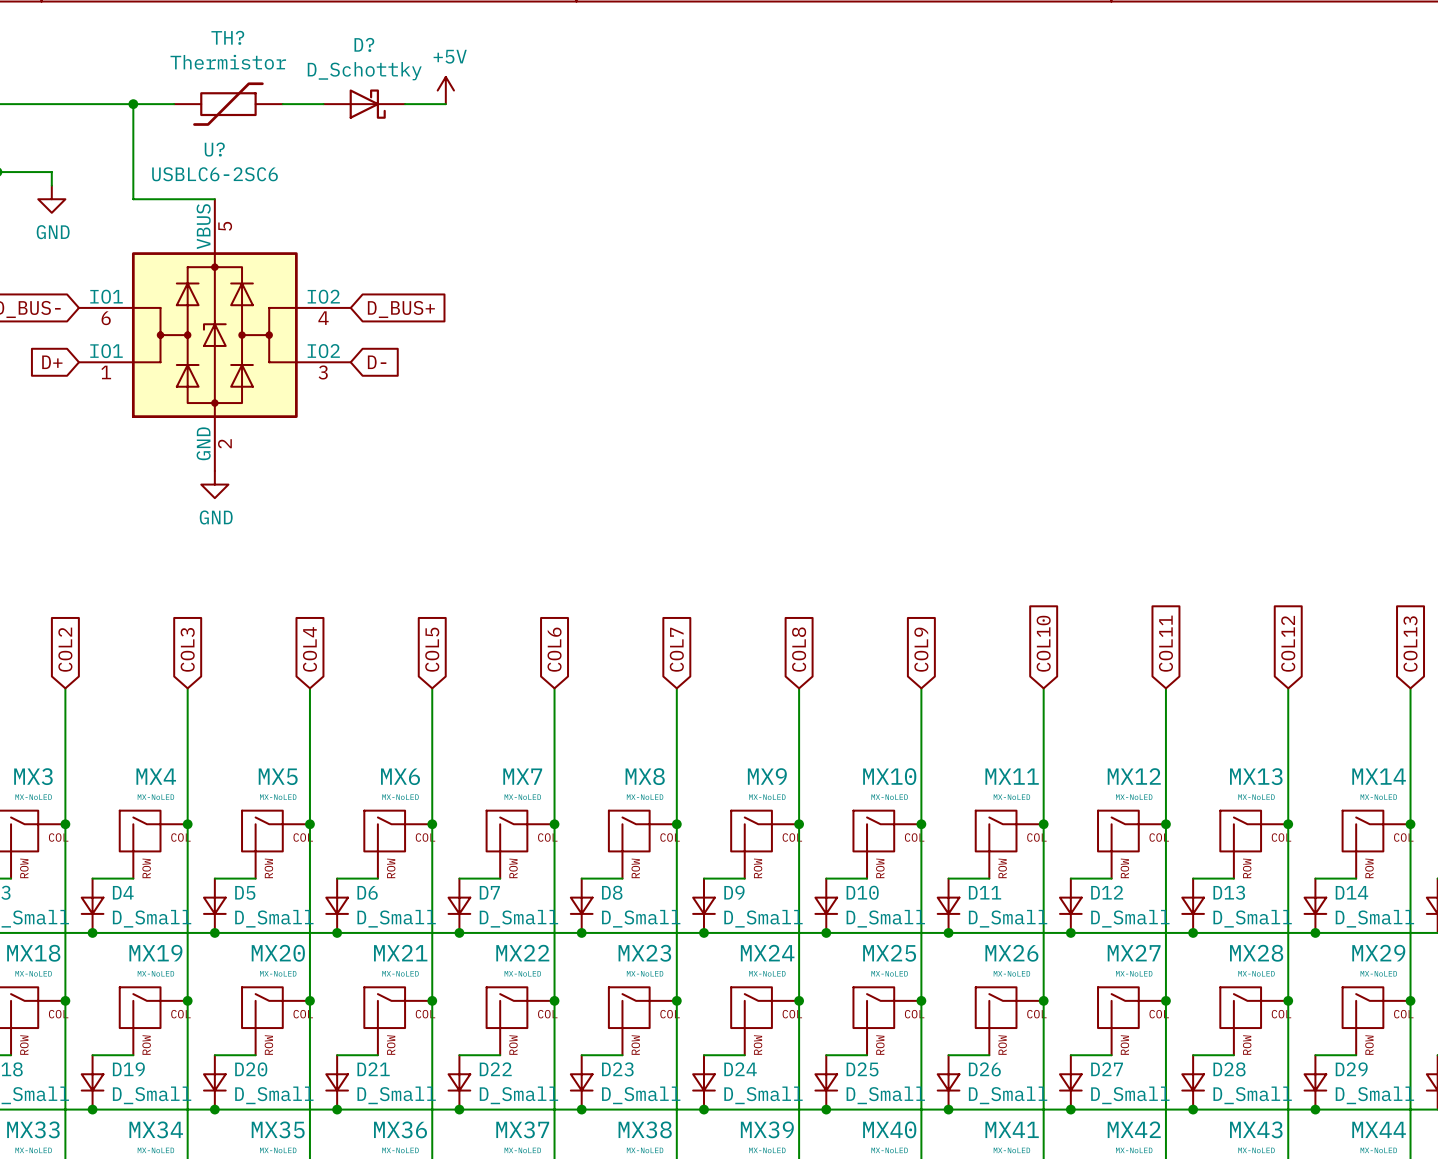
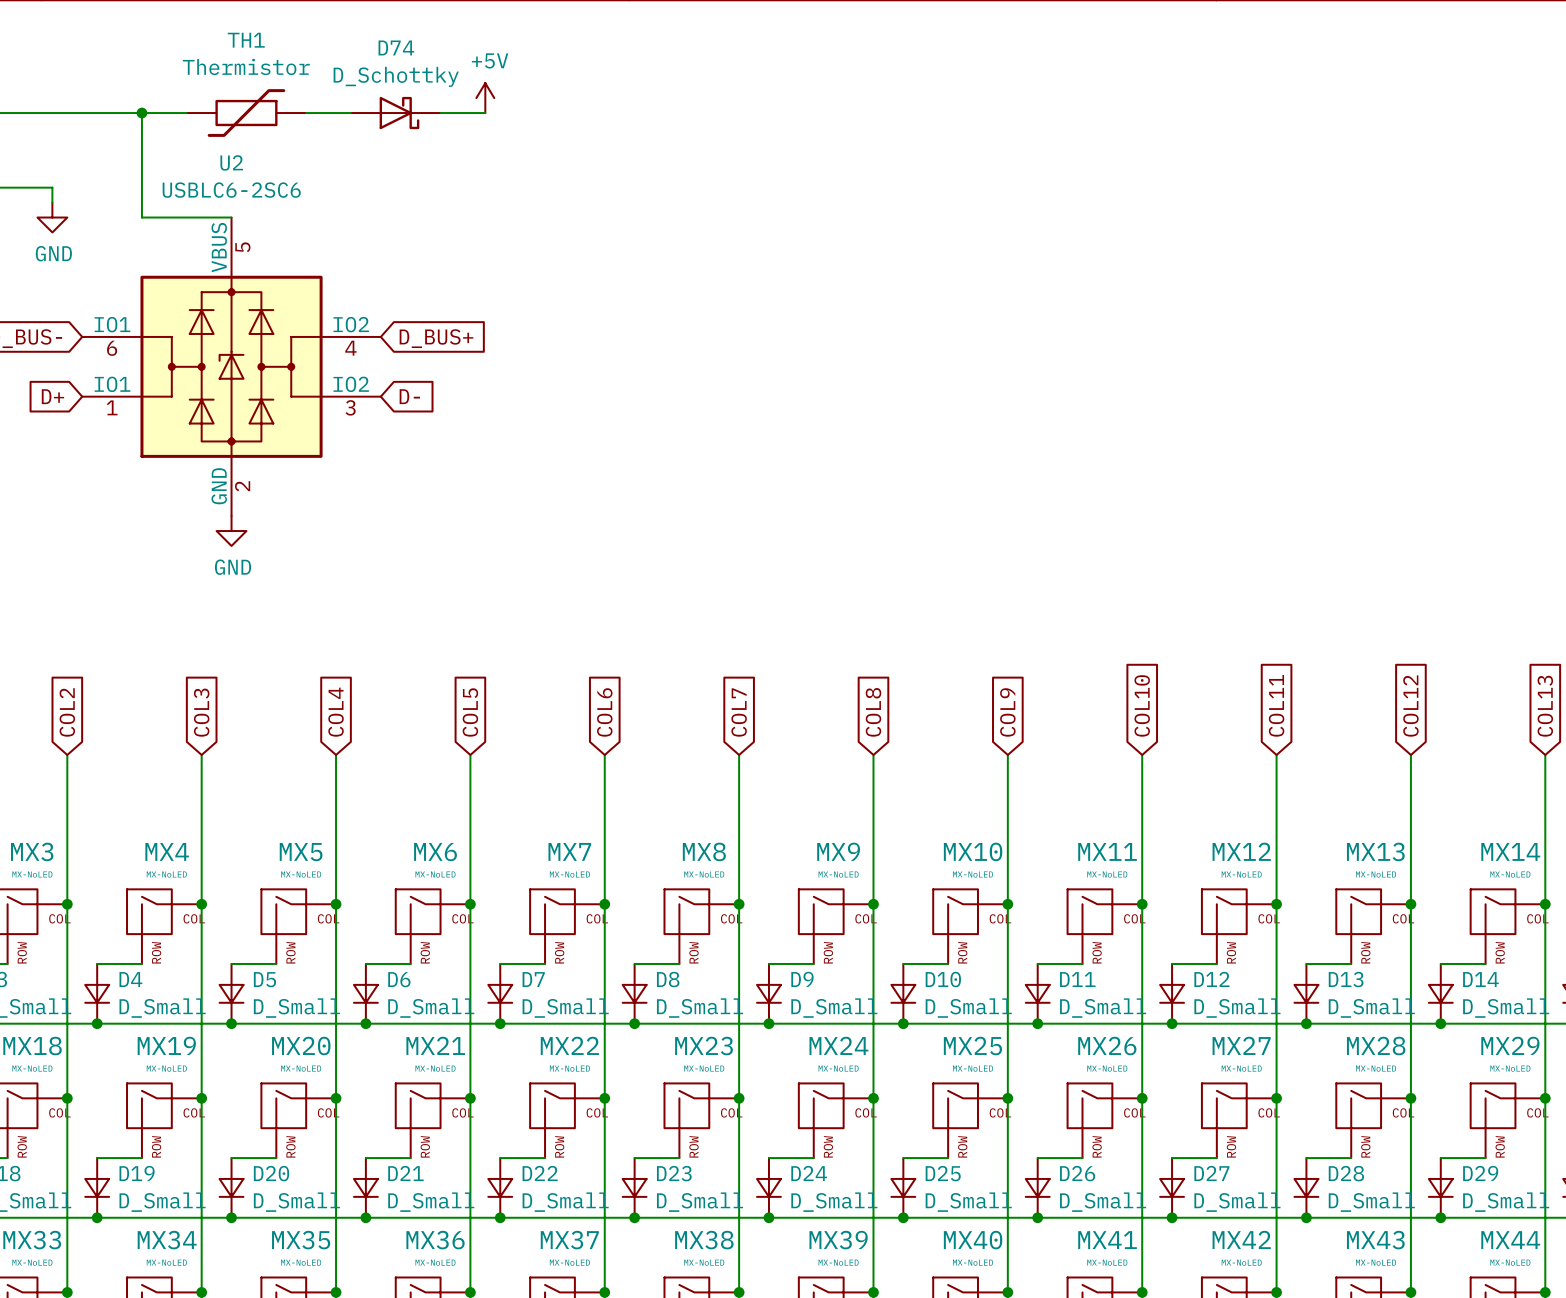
TH? name: TH? (227, 37) -> TH1 (246, 40)
D? name: D? (364, 44) -> D74 (396, 47)
U? name: U? (214, 149) -> U2 (231, 162)

